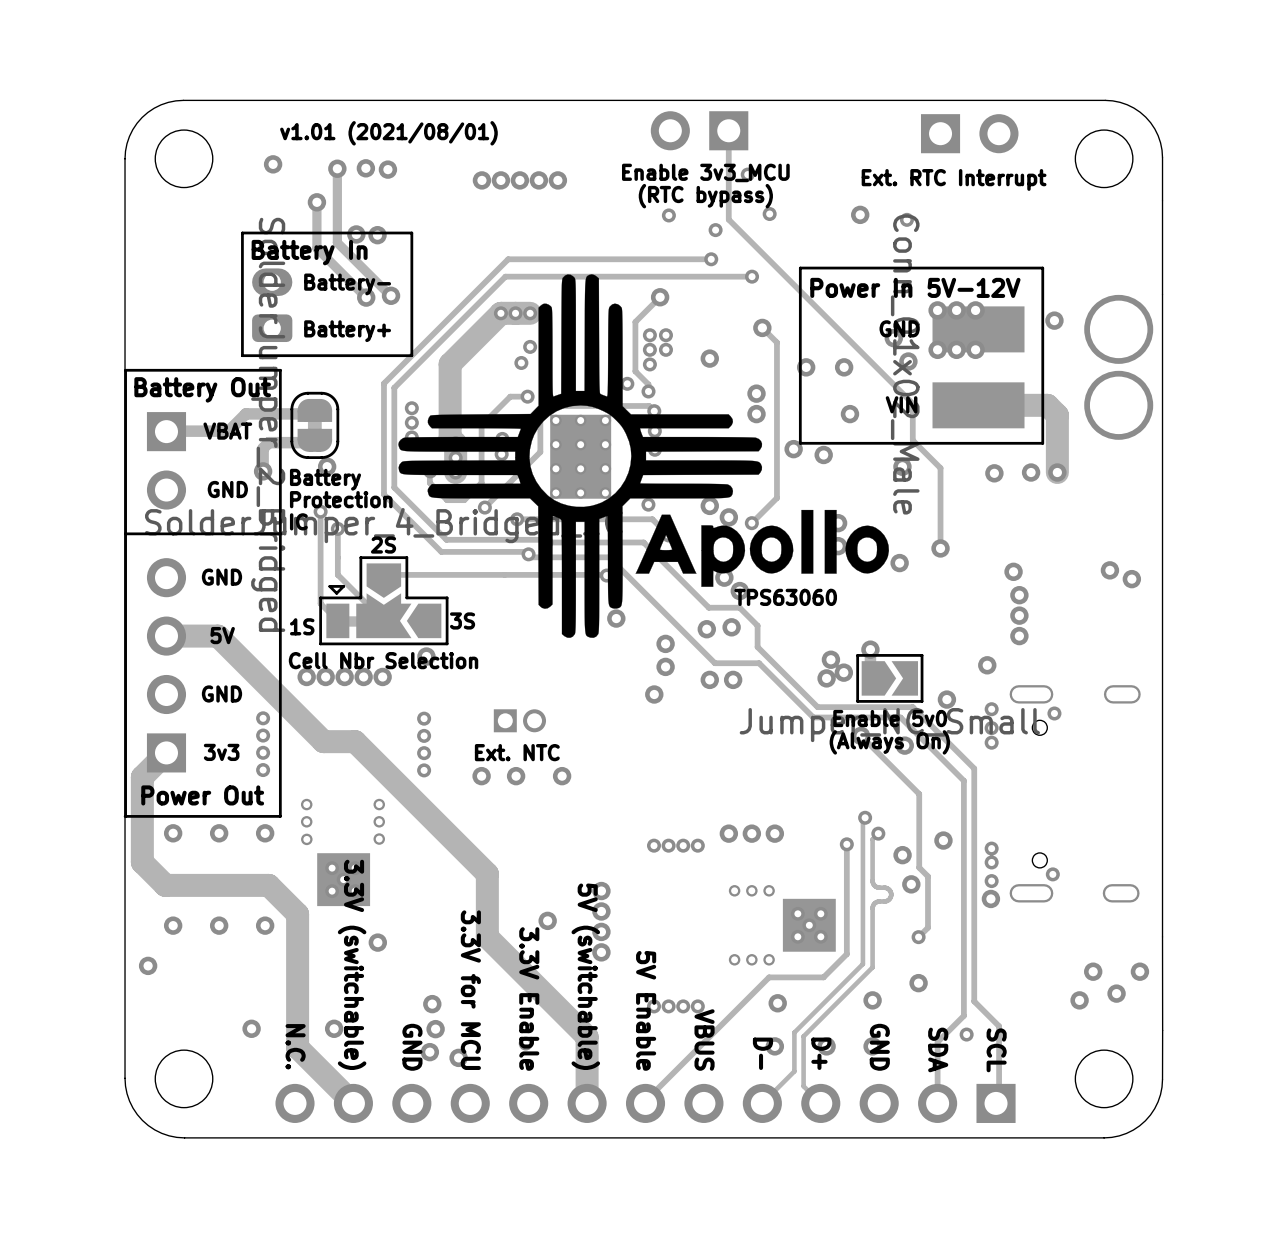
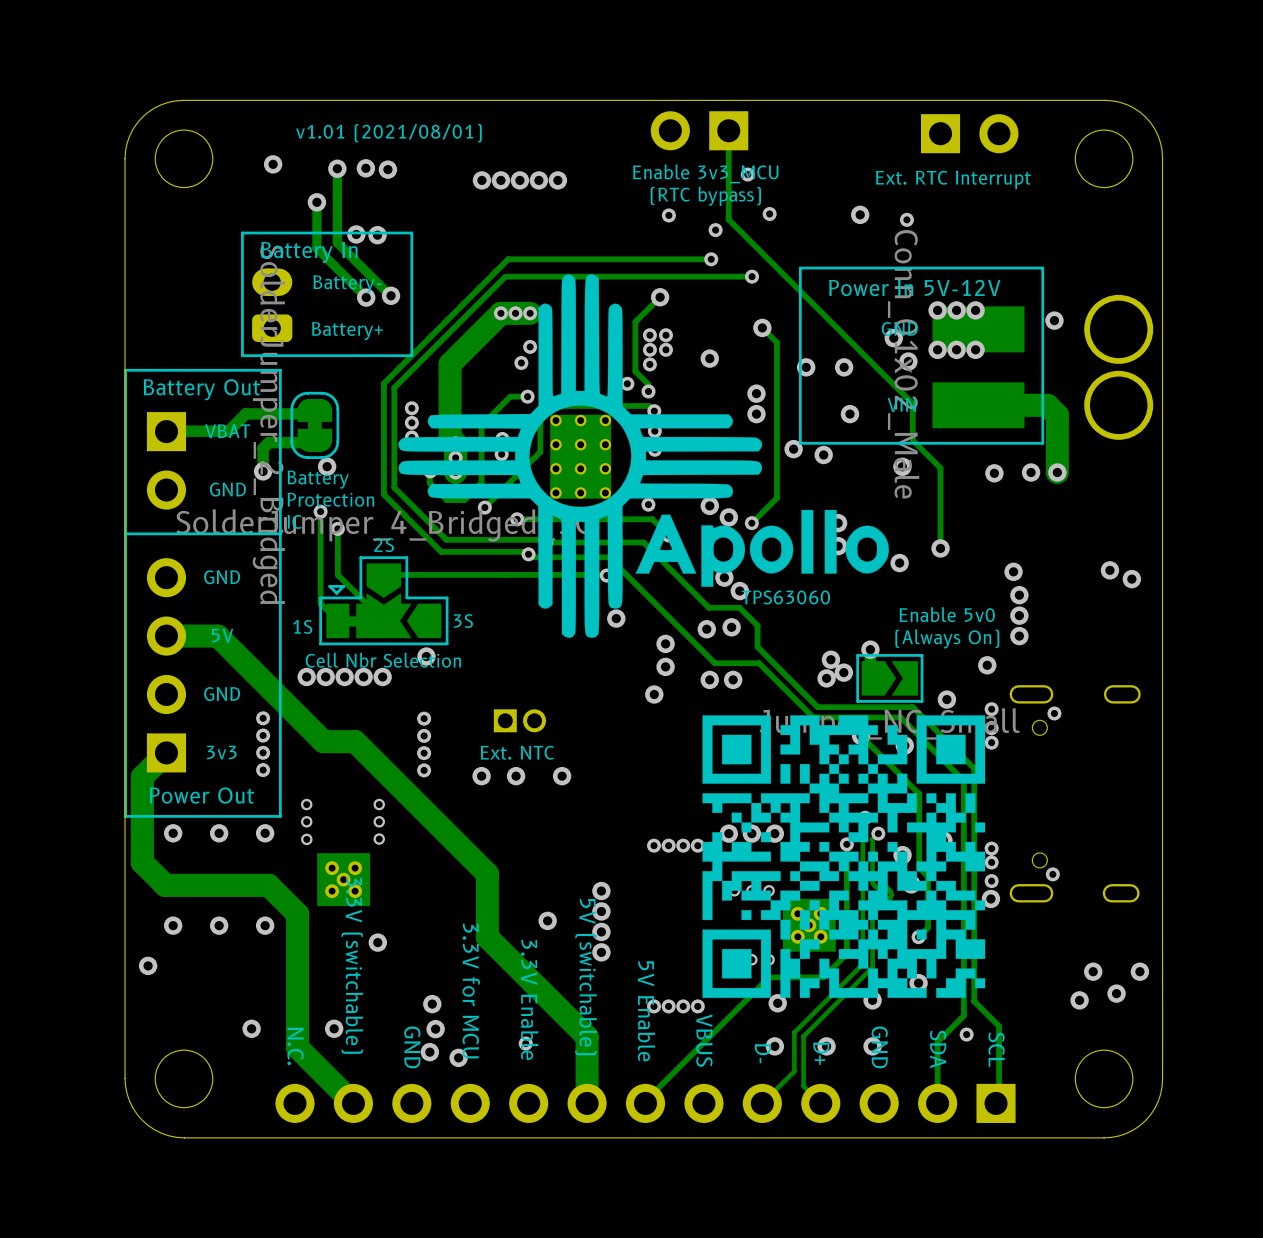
drawing: none -> [702, 715, 986, 998]
text position: Enable 5v0 (890, 718) -> Enable 5v0 (947, 614)
text position: (Always On) (889, 742) -> (Always On) (947, 638)

